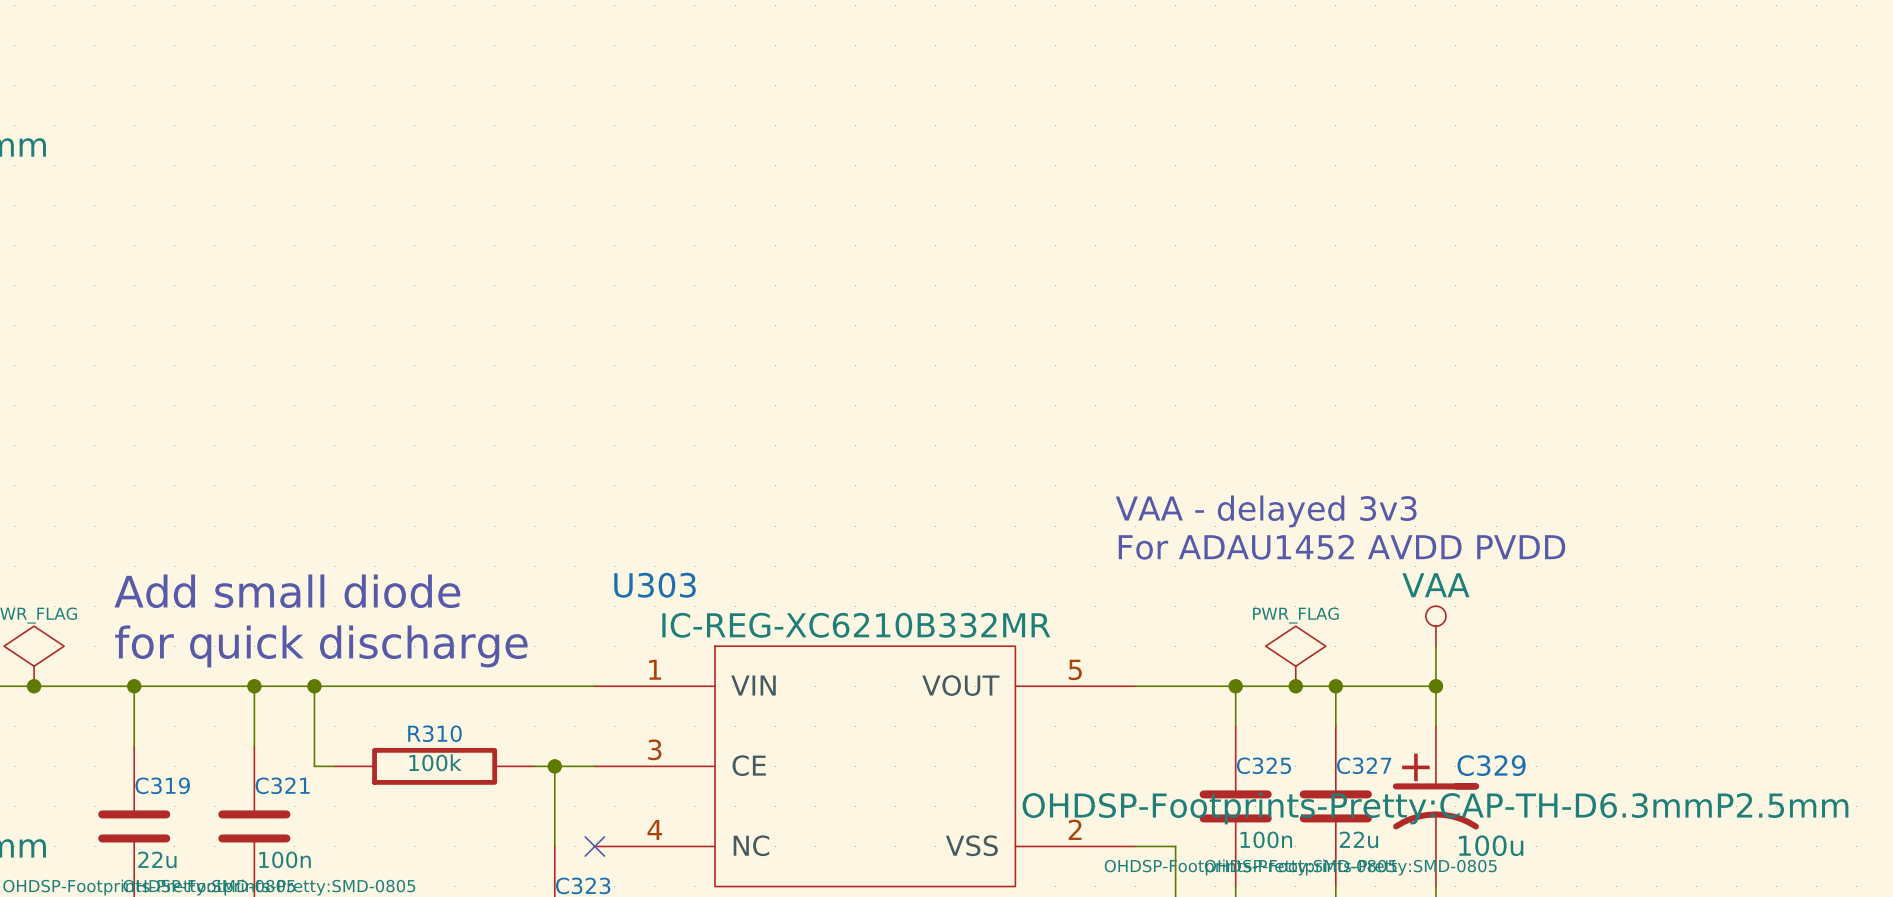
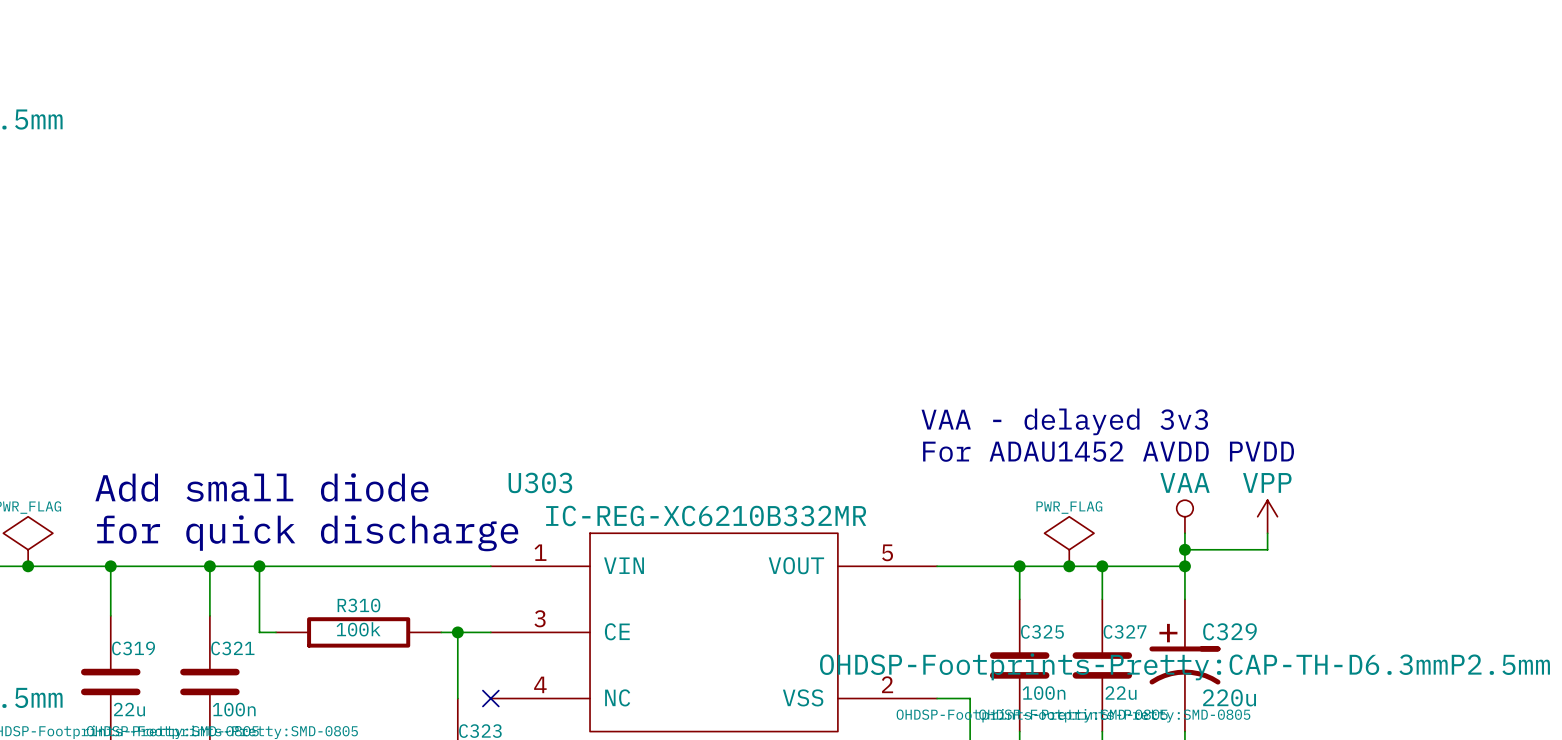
power symbol: none -> VPP (1267, 516)
wire: none -> (1267, 533) (1267, 549) (1184, 549)
junction: none -> (1184, 549)
C329 value: 100u (1491, 845) -> 220u (1229, 697)

